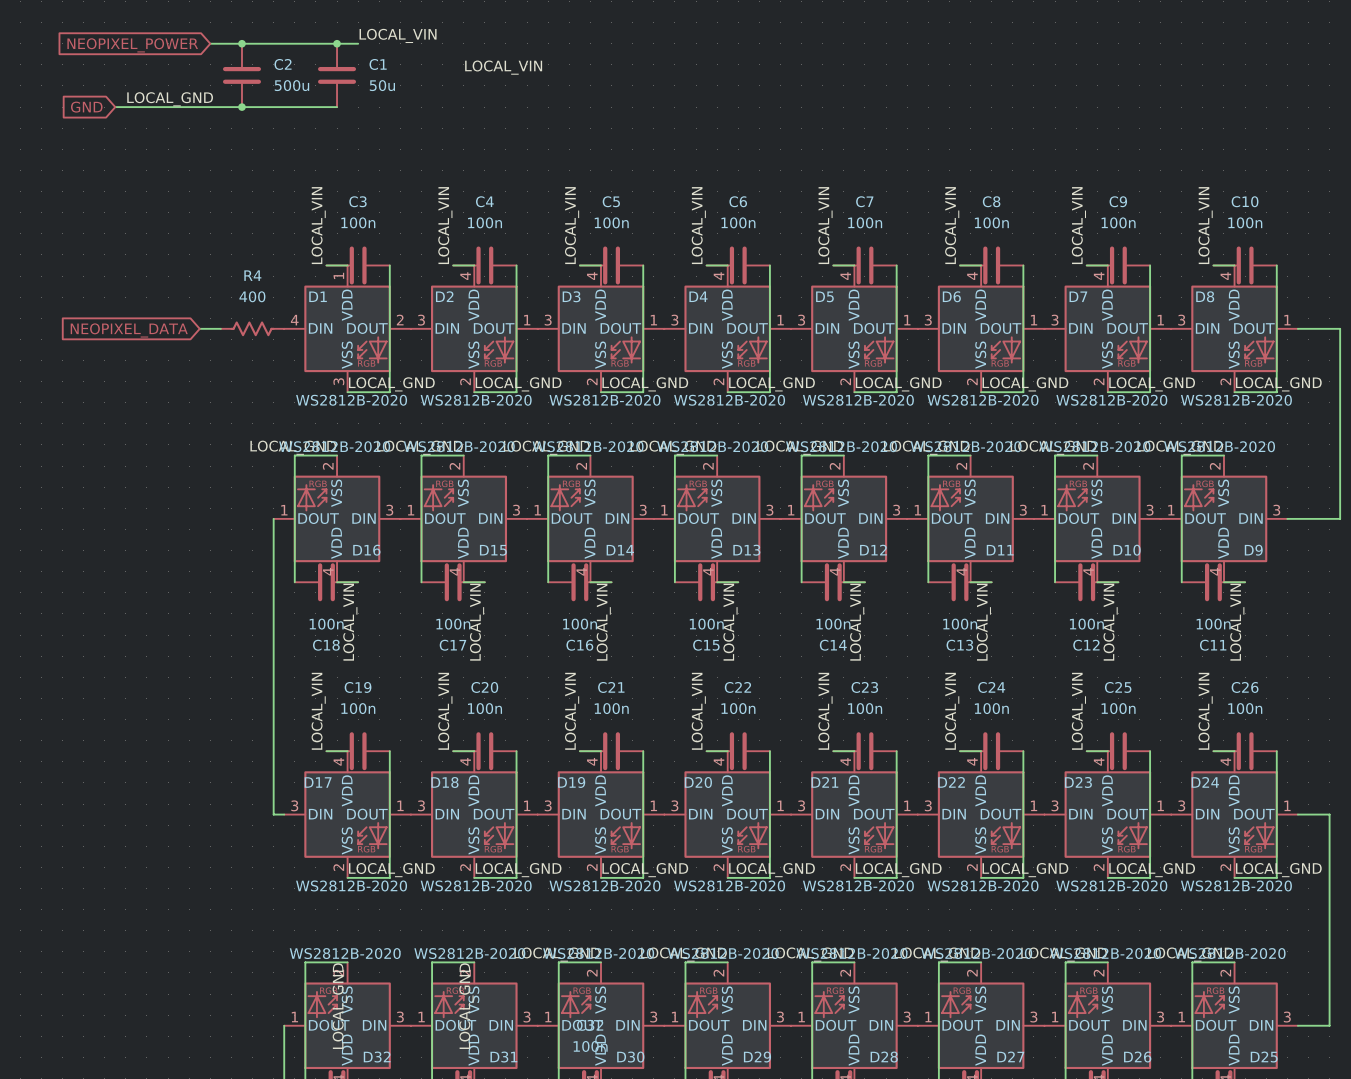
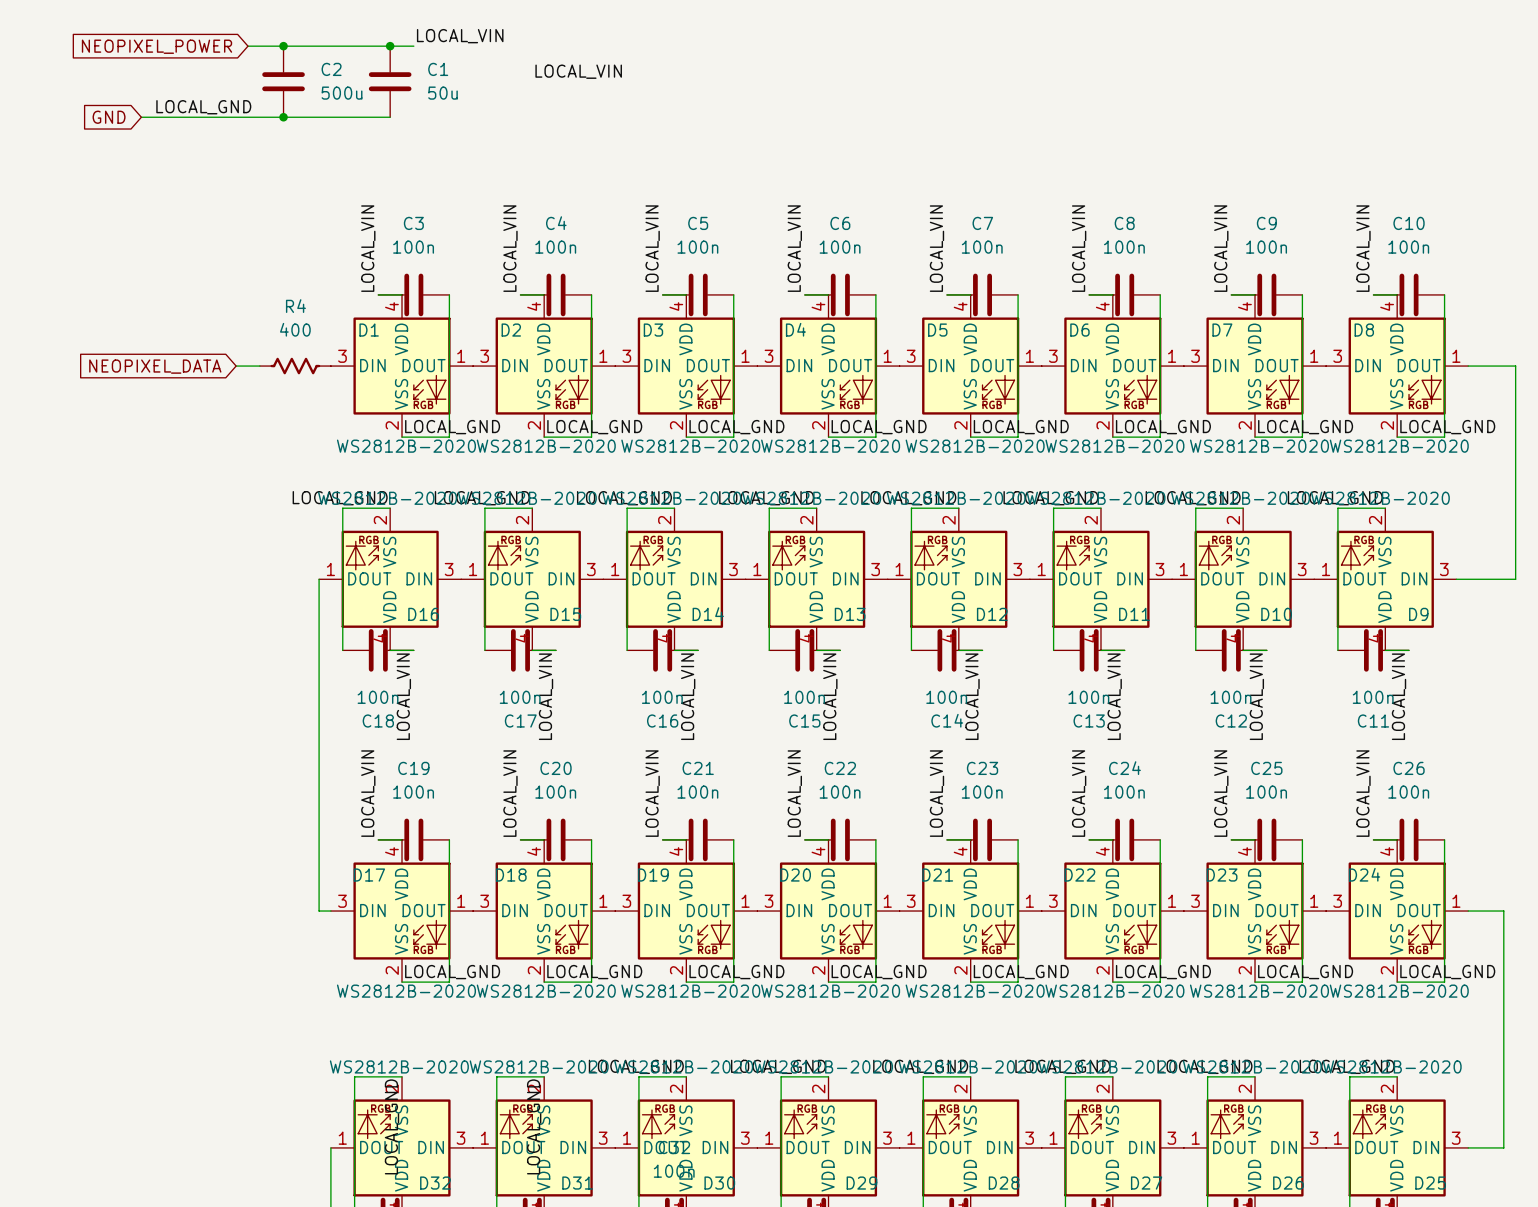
D1 pin number: 1 (338, 275) -> 4 (391, 306)
D1 pin number: 4 (294, 320) -> 3 (342, 356)
D1 pin number: 2 (400, 320) -> 1 (461, 356)
D1 pin number: 3 (338, 381) -> 2 (392, 425)

